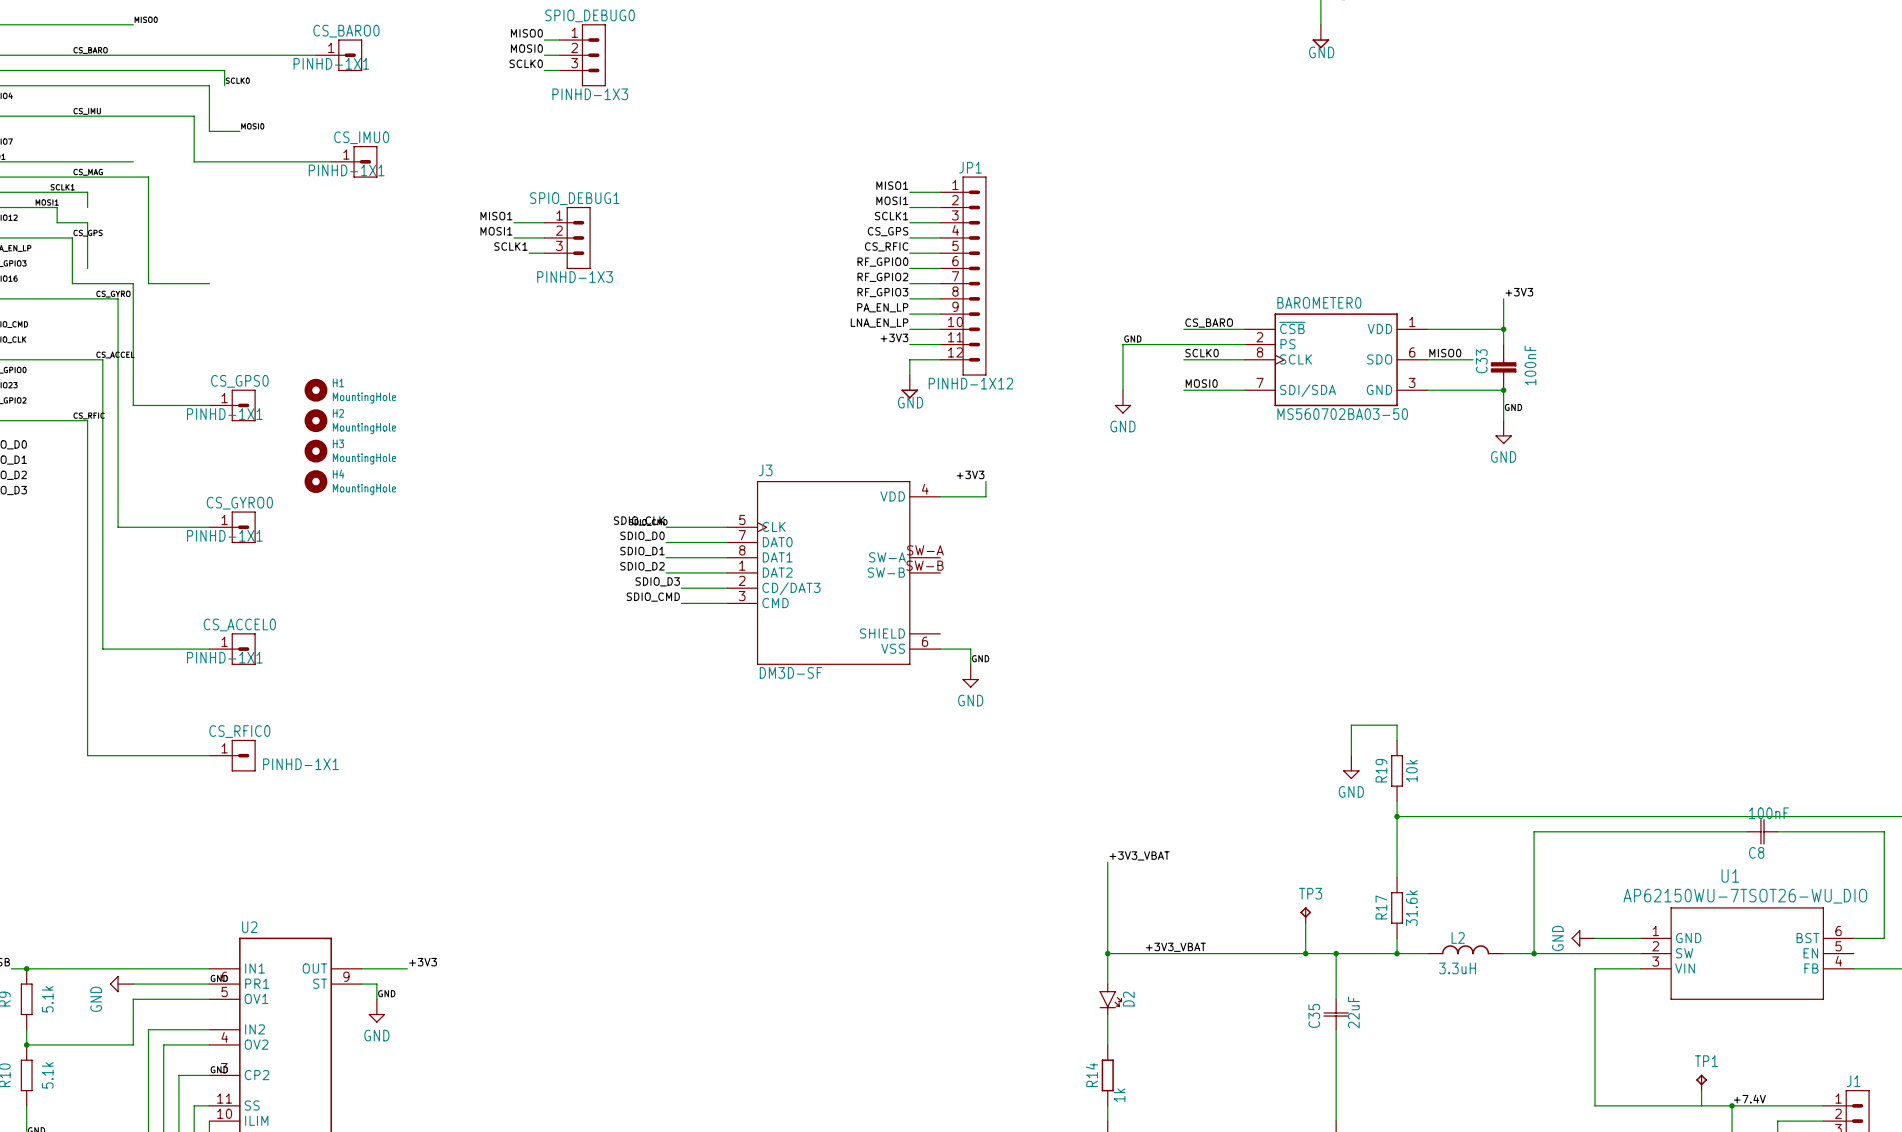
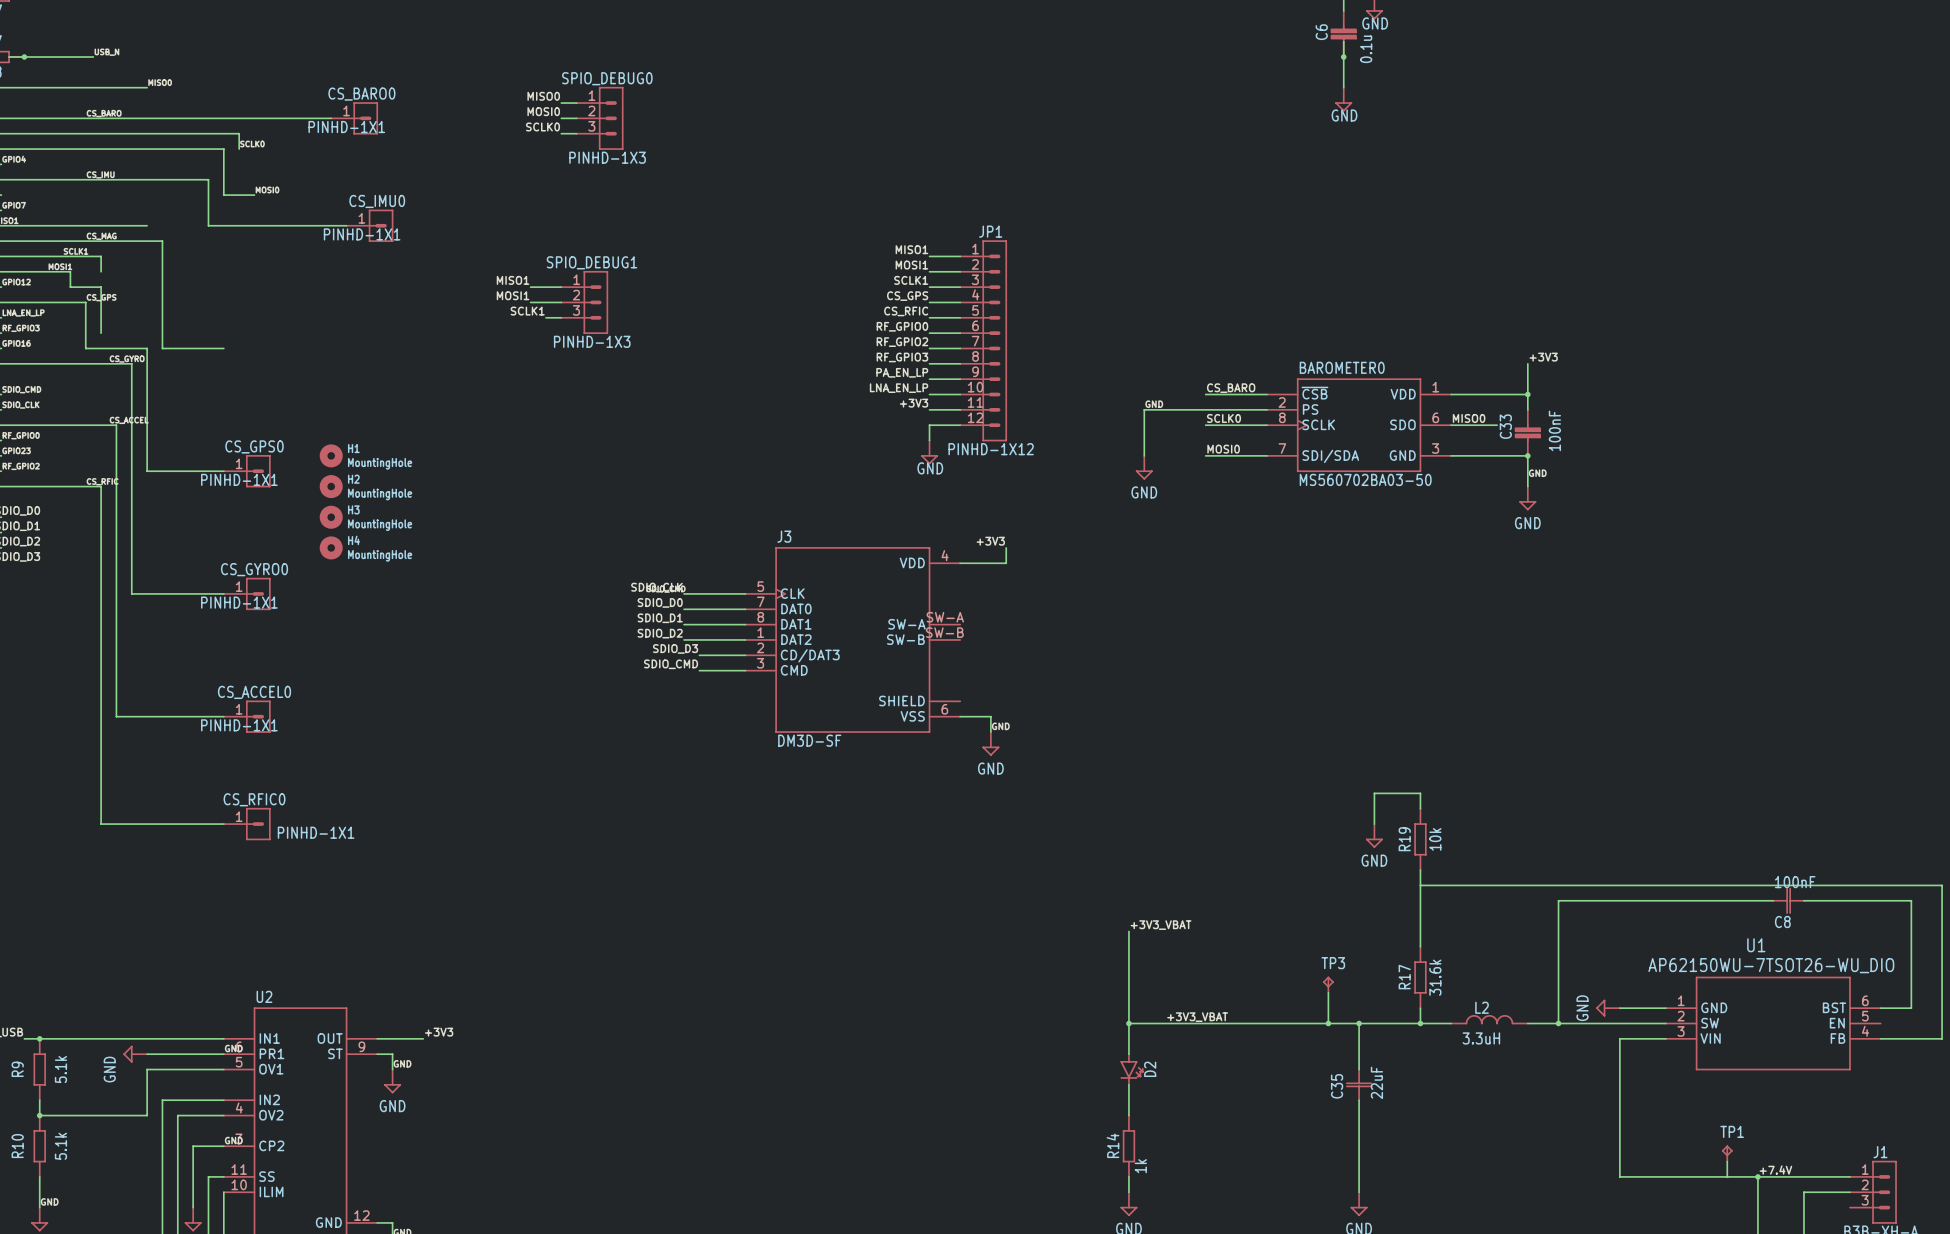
junction: (1397, 816) -> none

